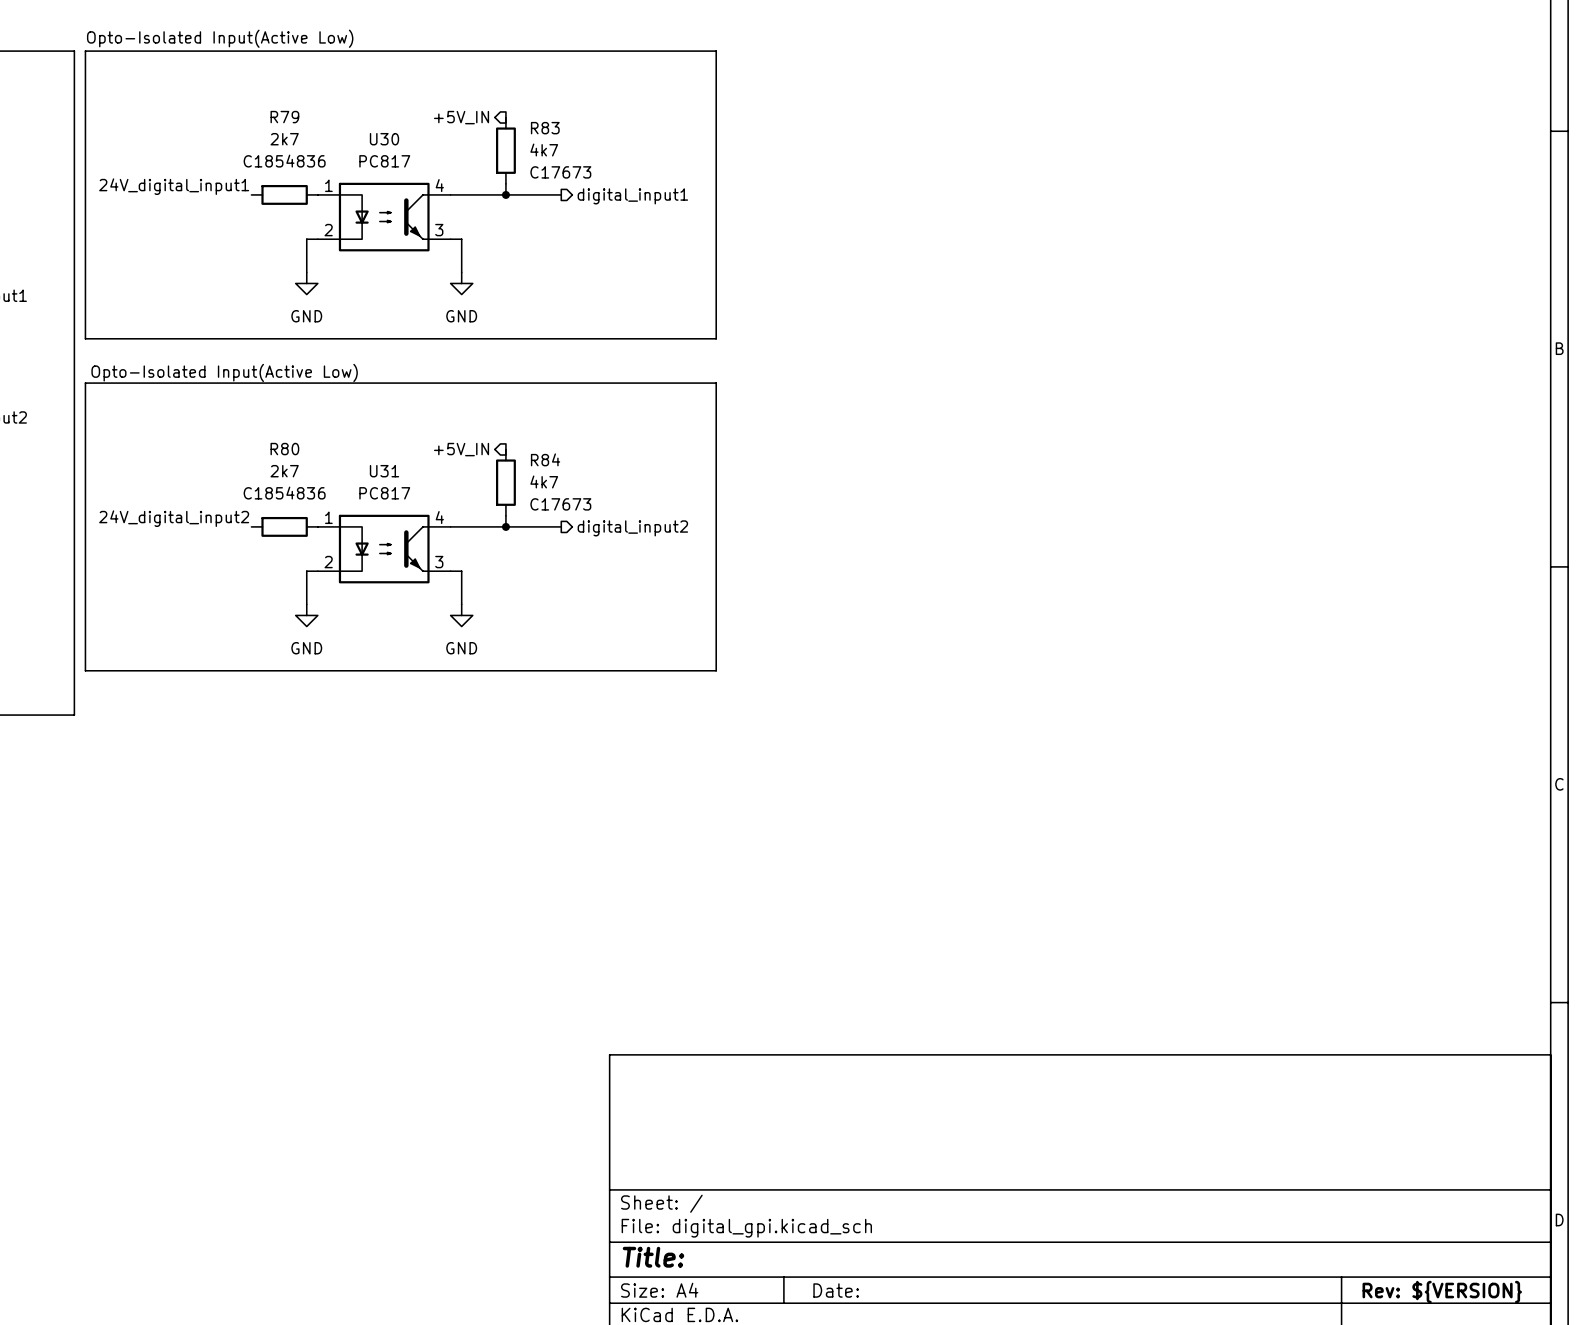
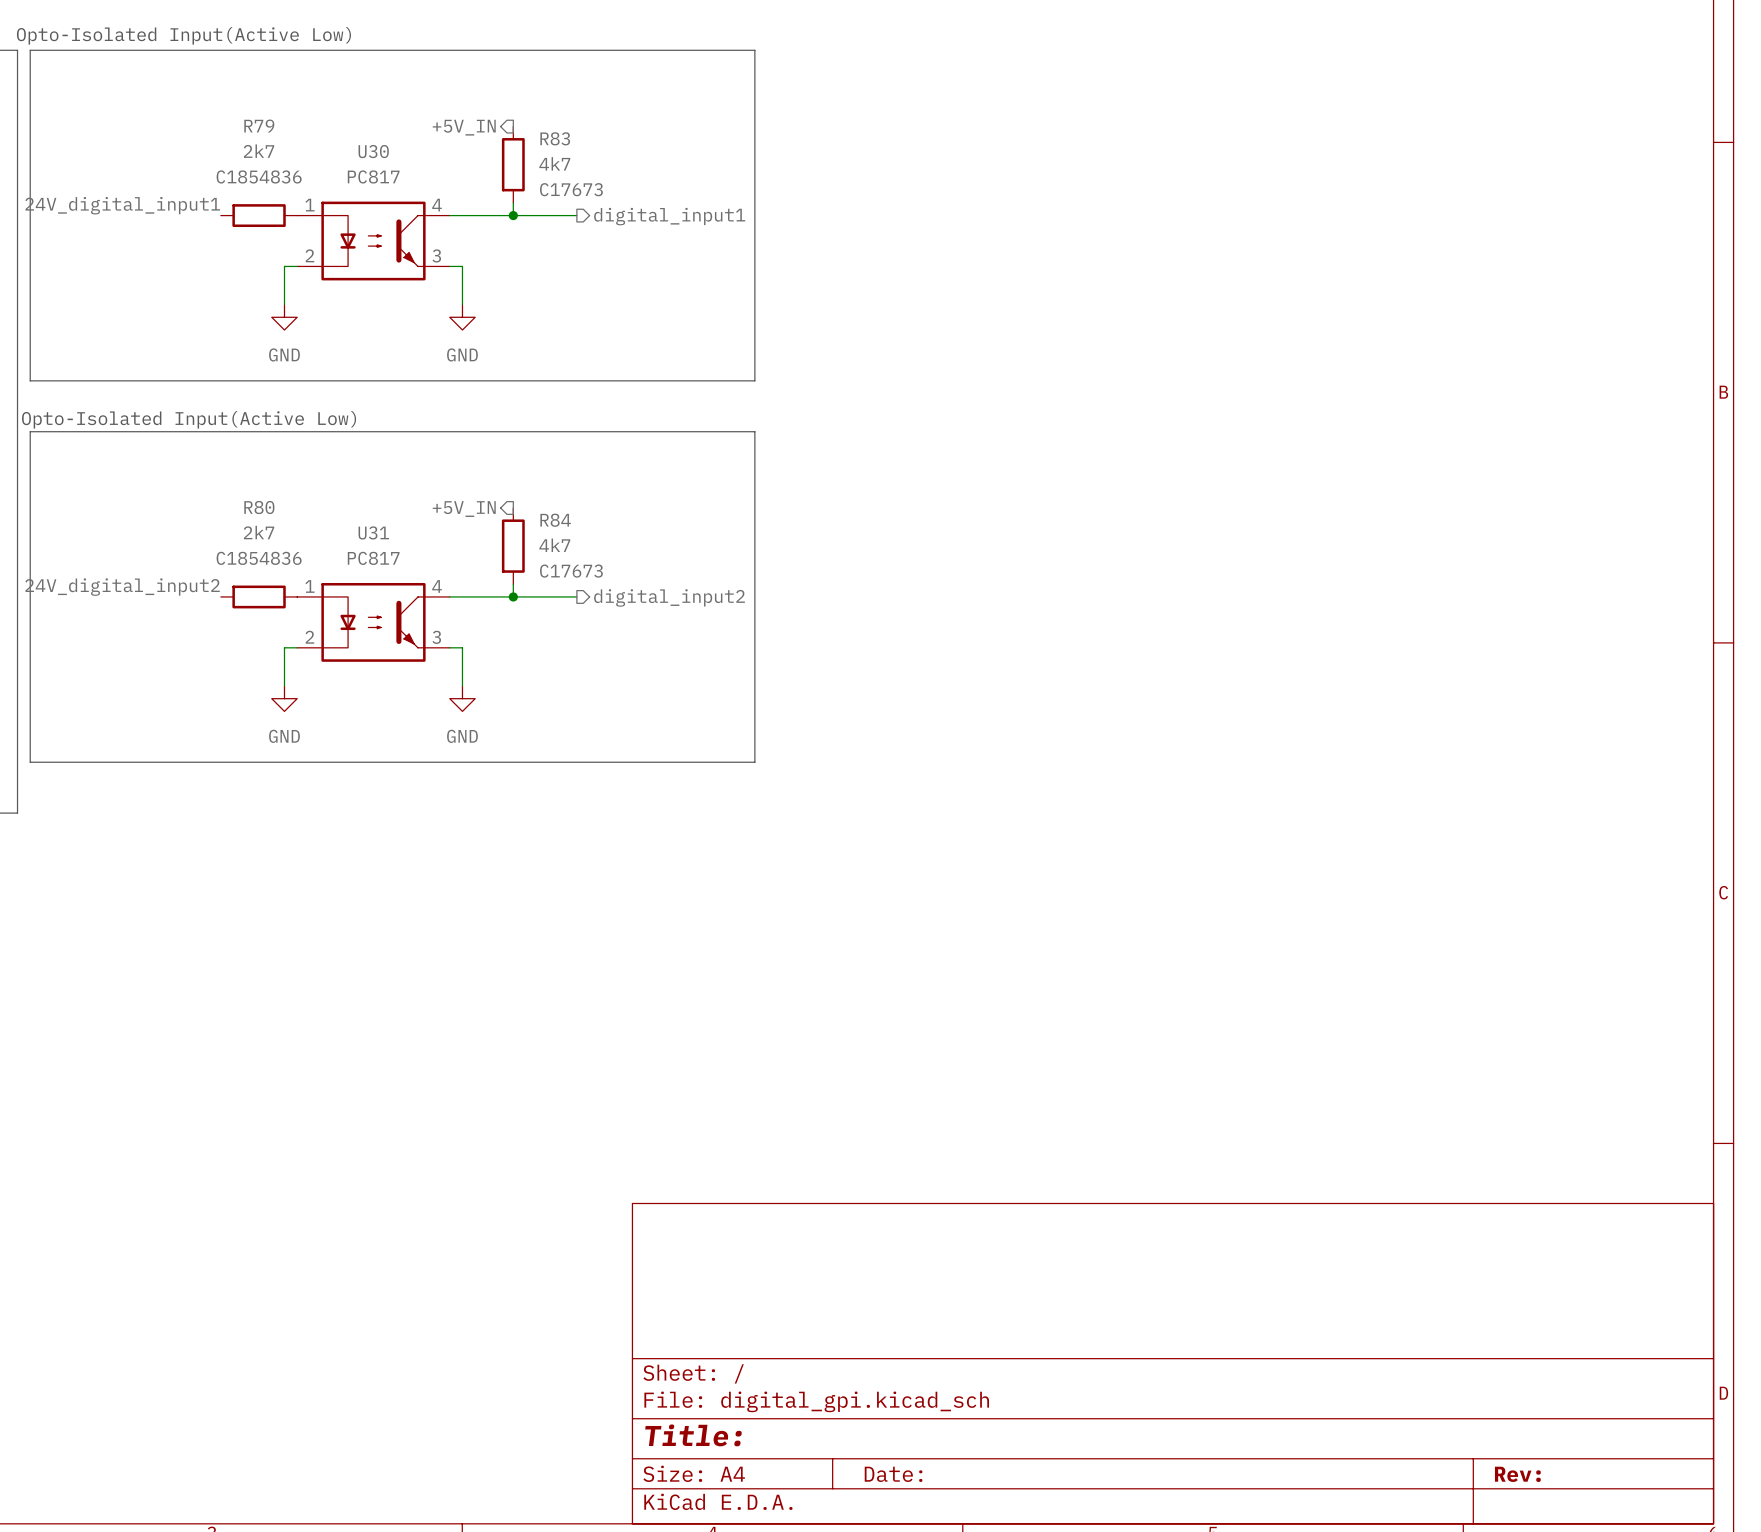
title block: Rev: ${VERSION} (1442, 1292) -> Rev: (1517, 1474)

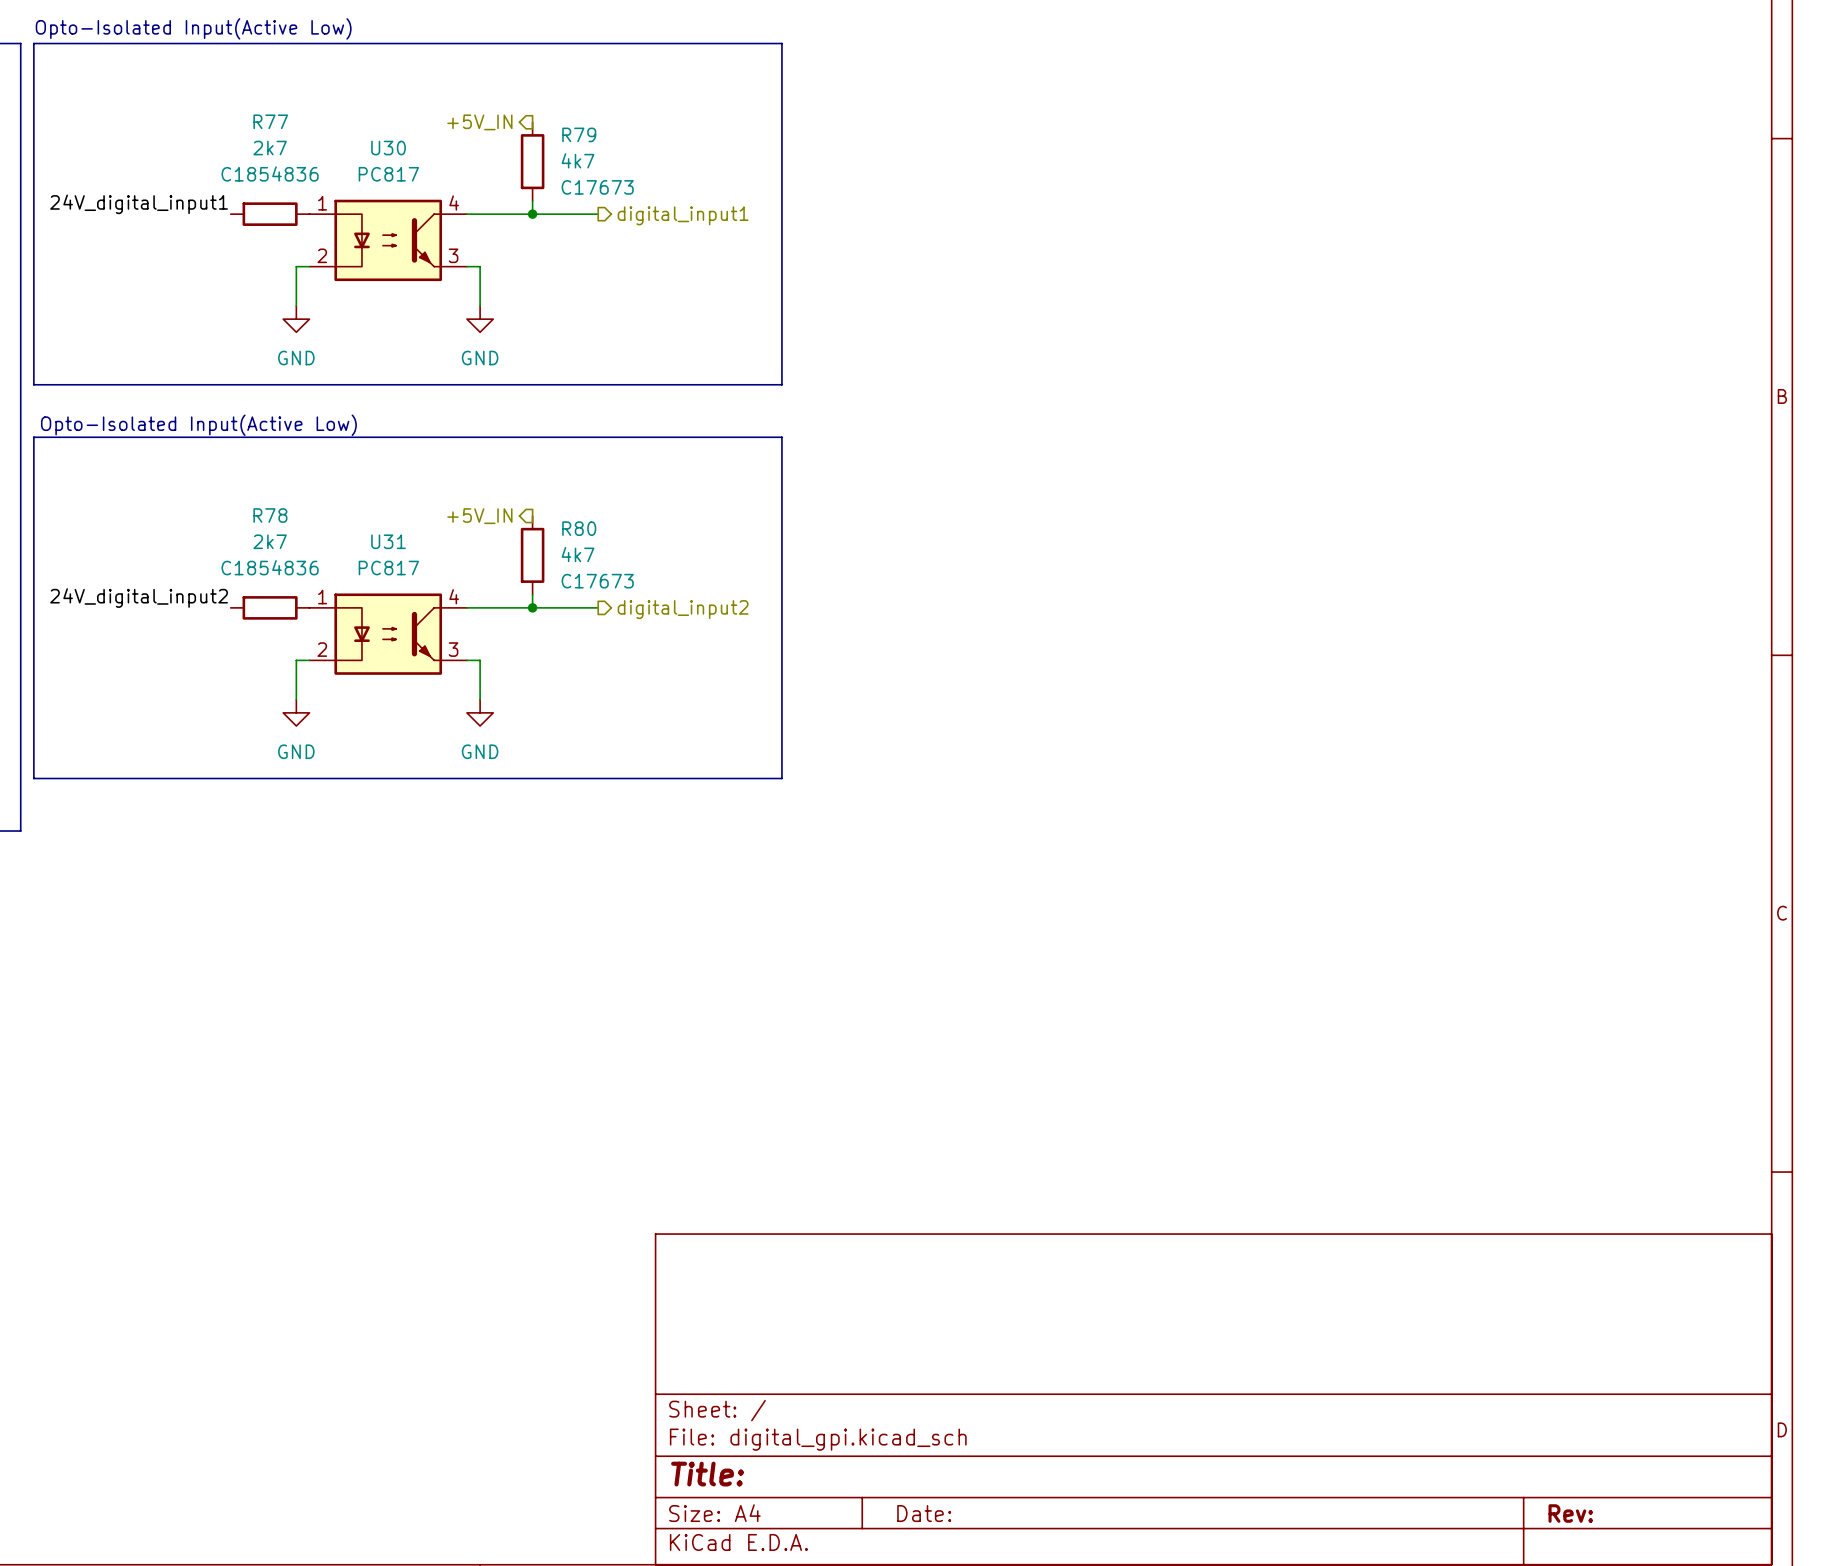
R79 name: R79 (259, 126) -> R77 (270, 121)
R83 name: R83 (555, 138) -> R79 (579, 134)
R80 name: R80 (259, 507) -> R78 (270, 515)
R84 name: R84 (555, 520) -> R80 (579, 528)

